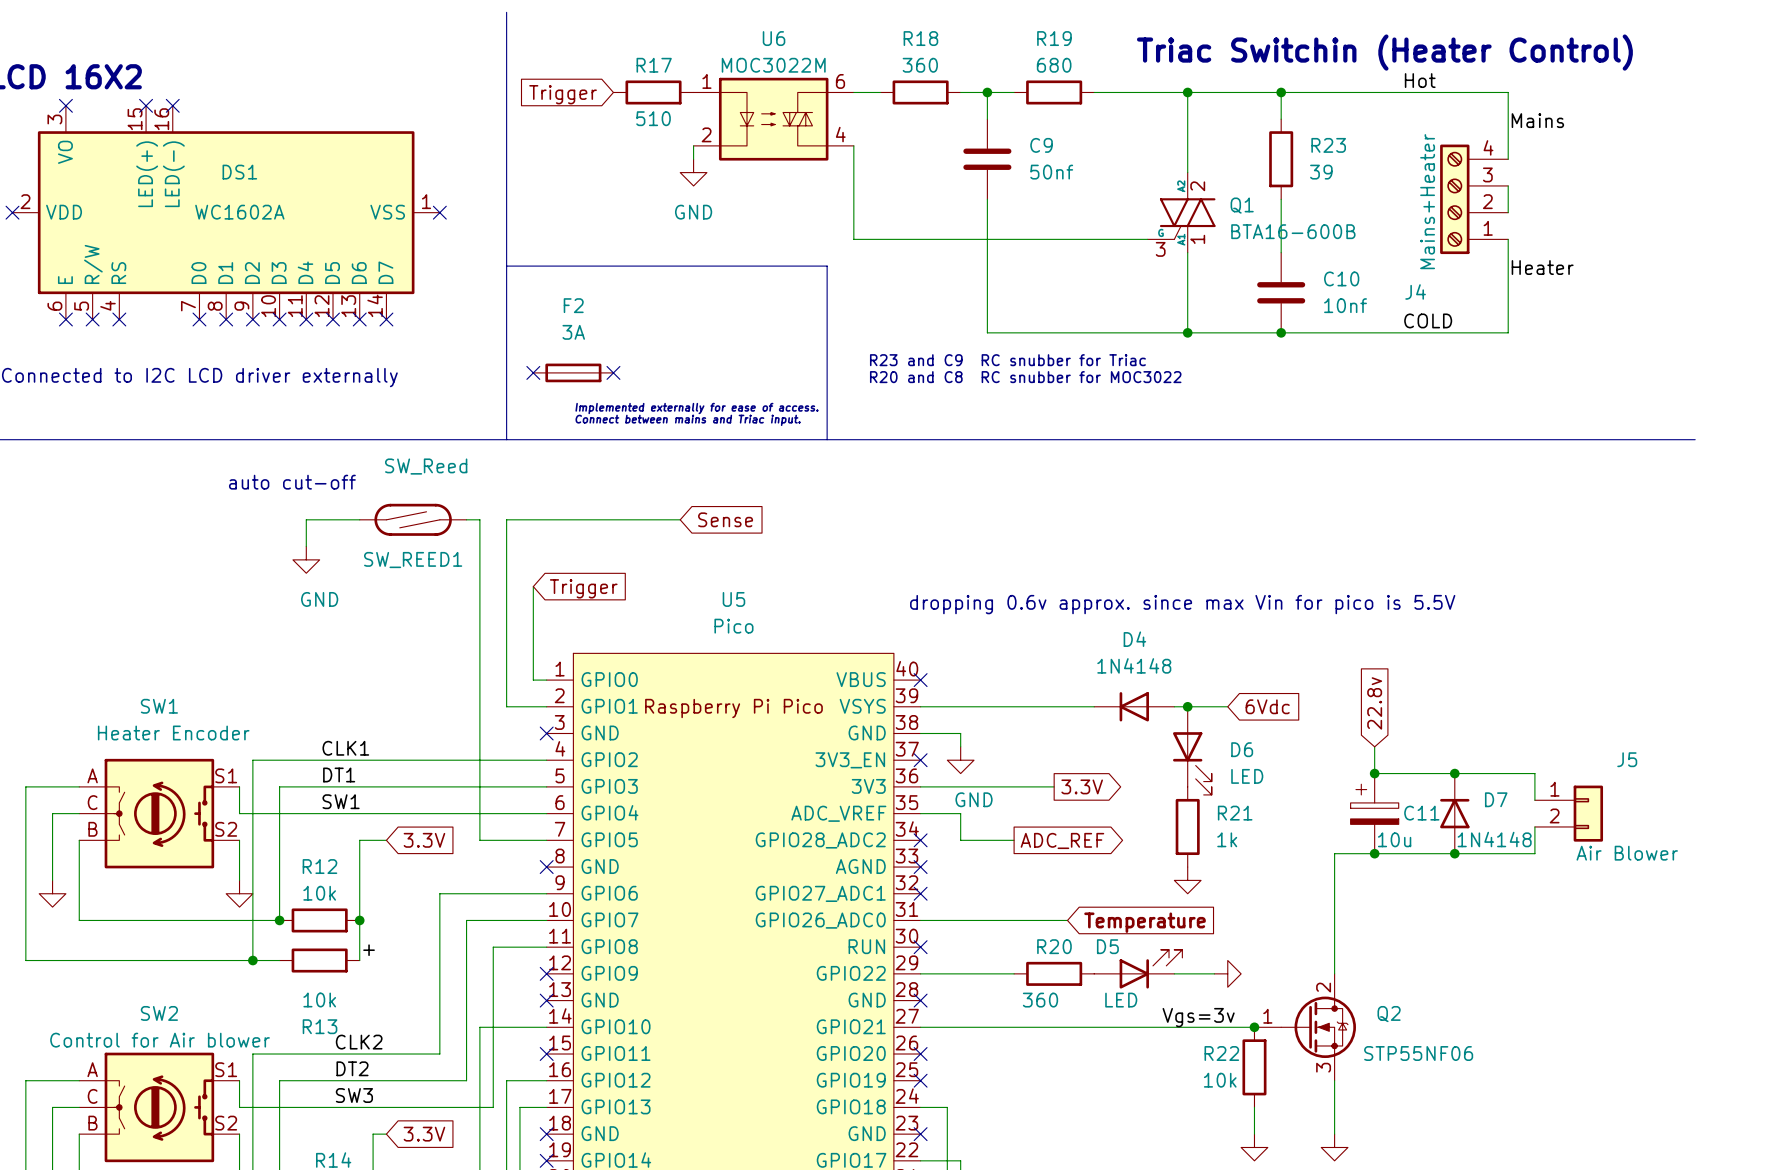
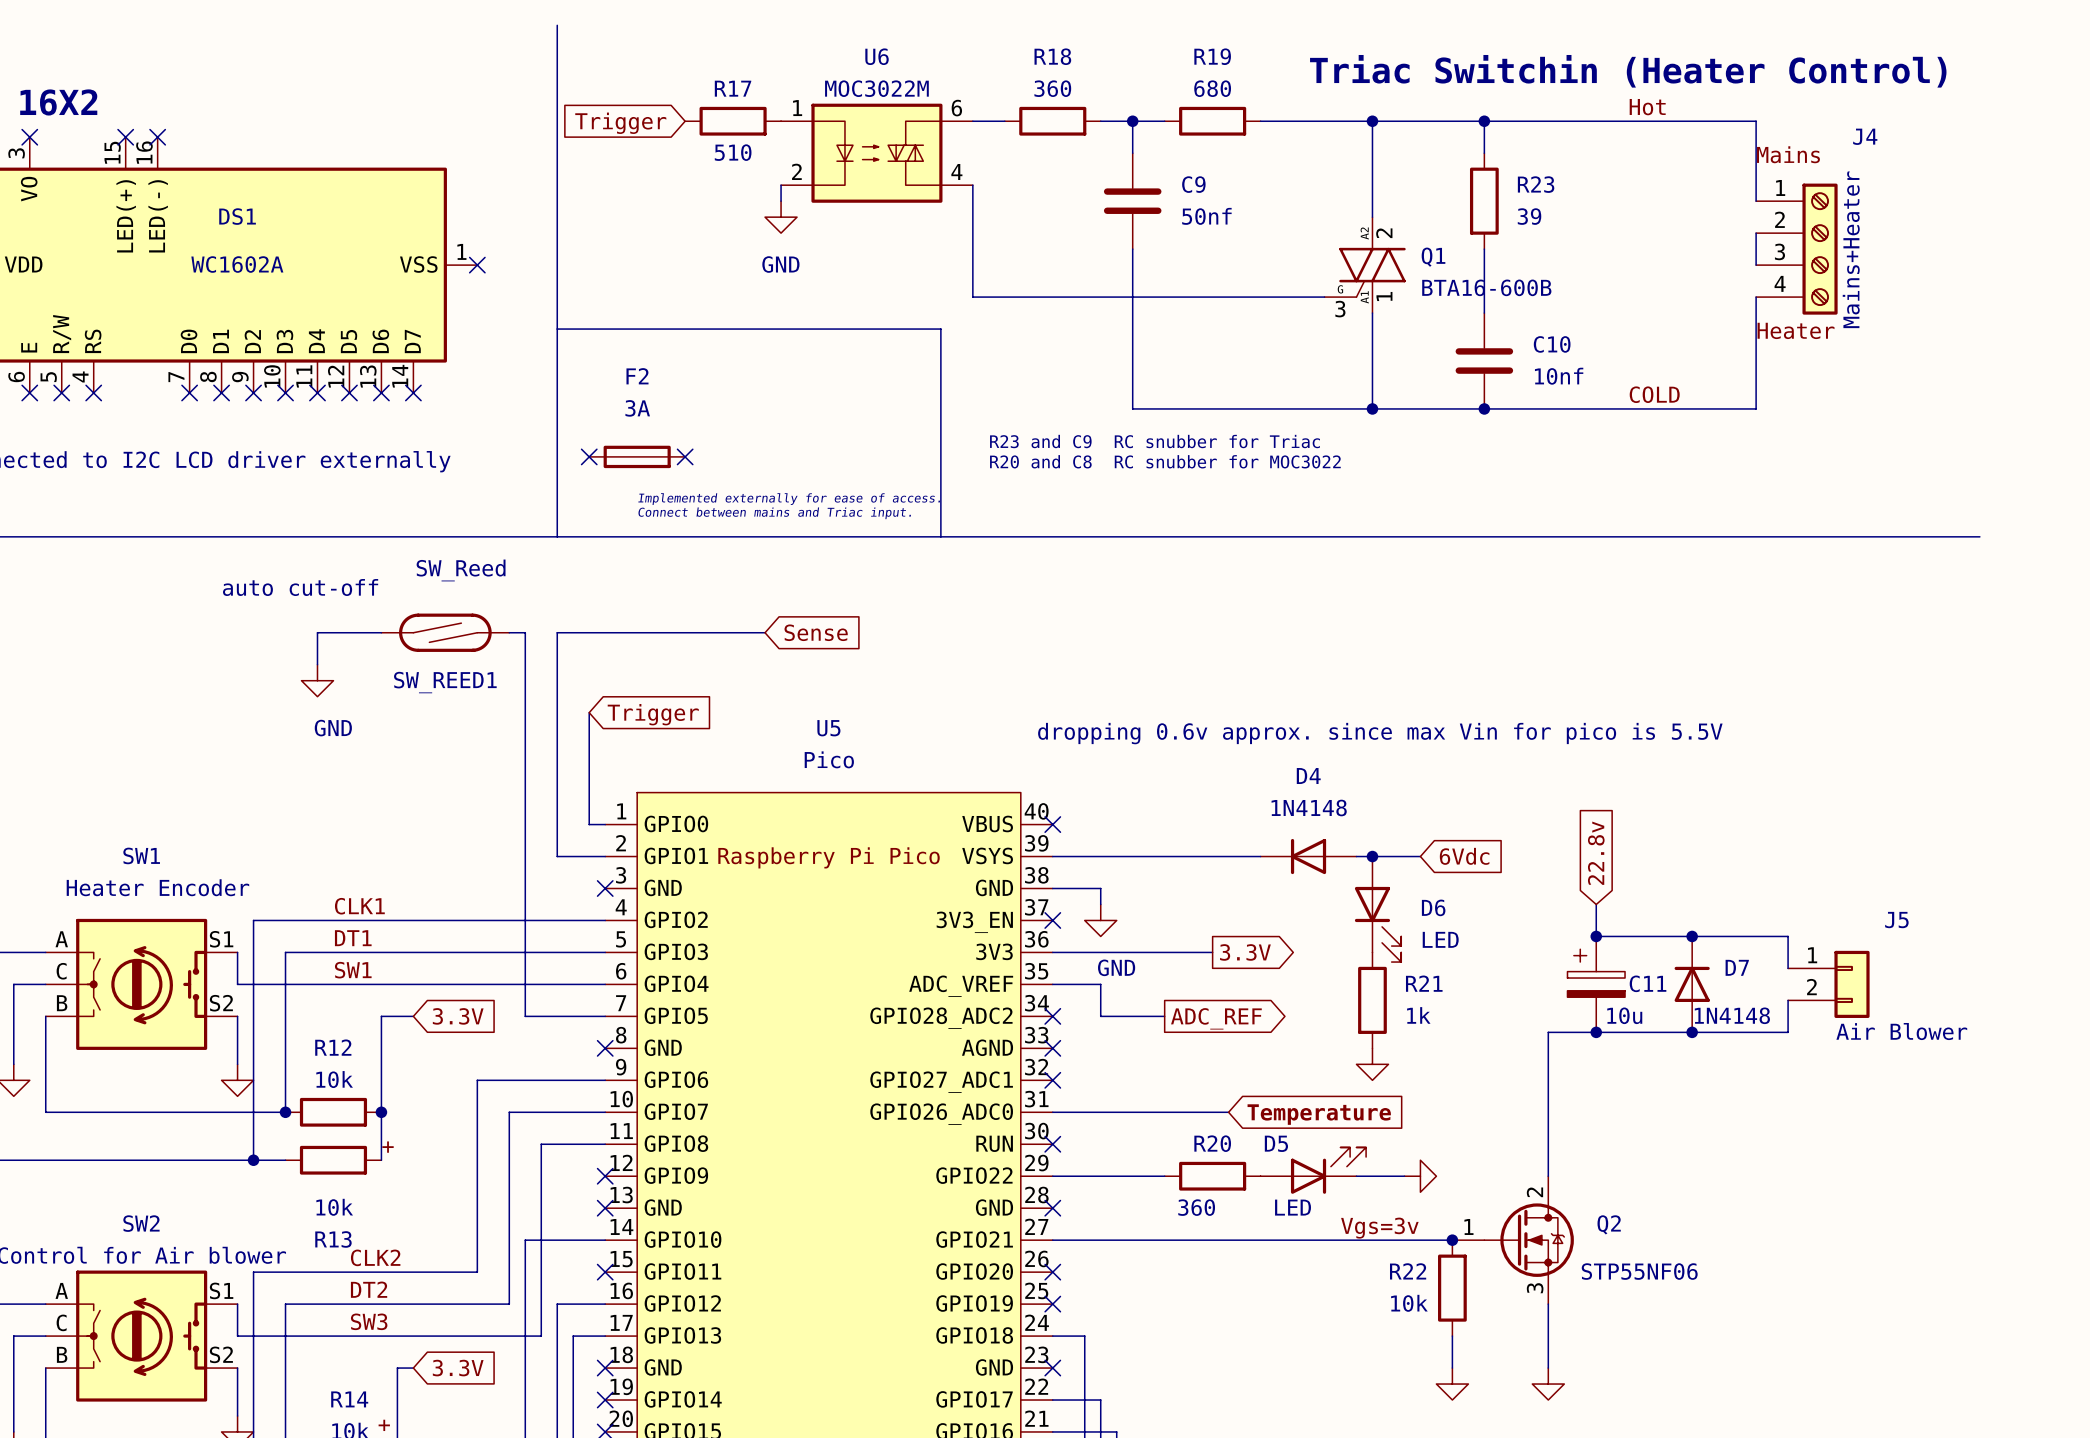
J4 rotation: 0° (1454, 199) -> 180° (1820, 249)
J4 position: (1474, 199) -> (1796, 249)

